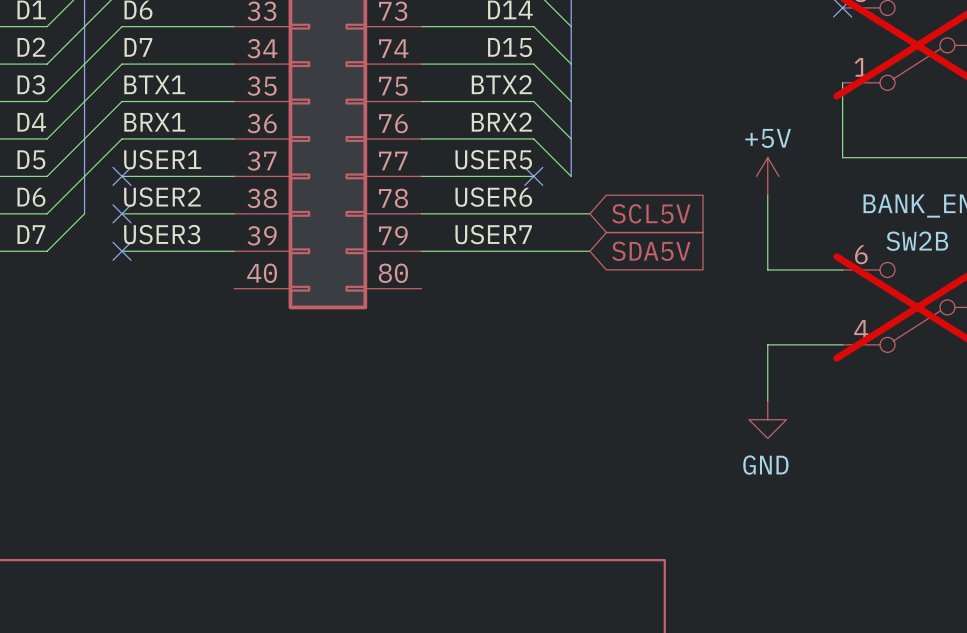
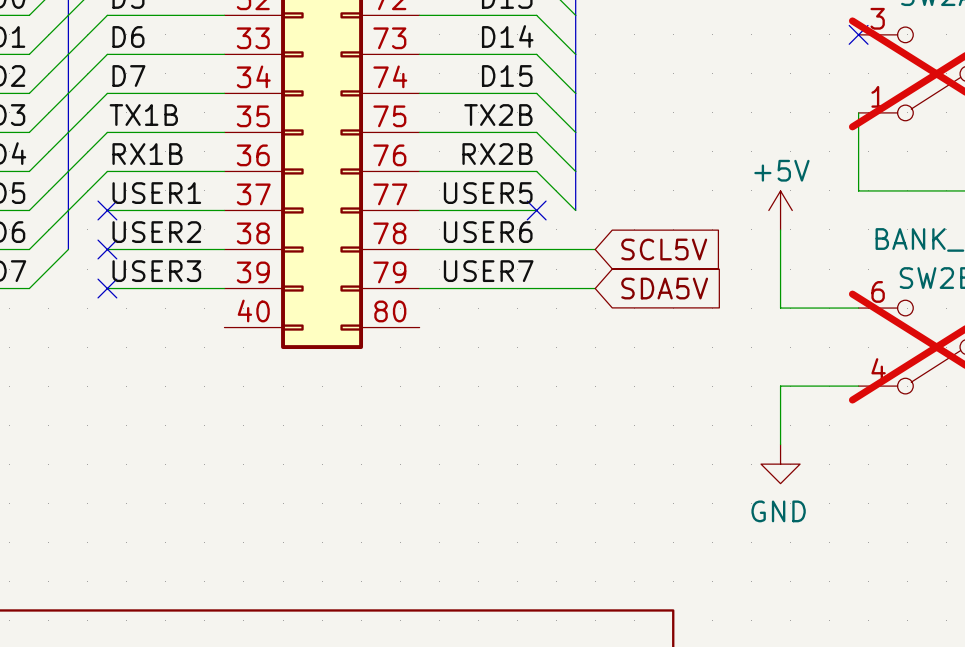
label: BTX1 (154, 84) -> TX1B (143, 115)
label: BTX2 (501, 84) -> TX2B (498, 115)
label: BRX1 (154, 122) -> RX1B (147, 154)
label: BRX2 (501, 122) -> RX2B (497, 154)

